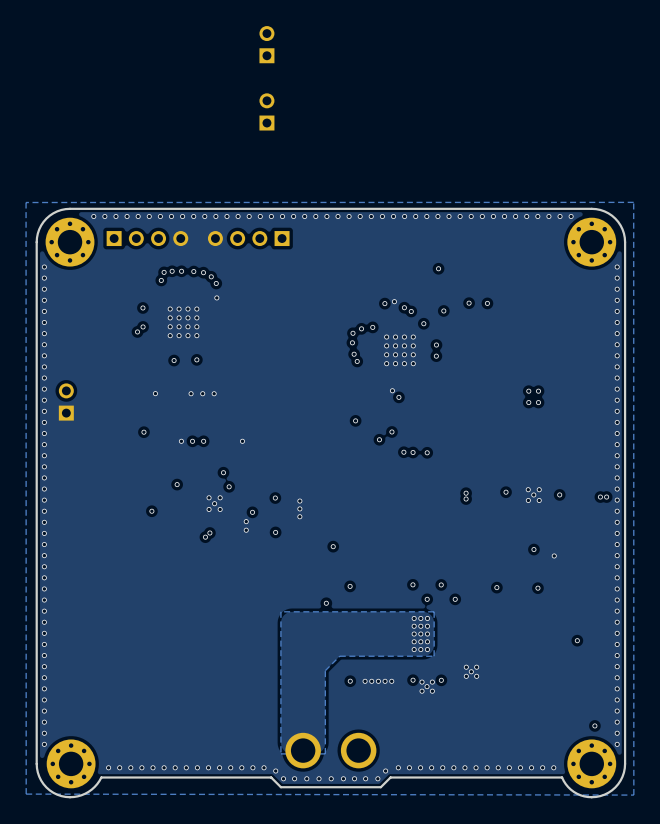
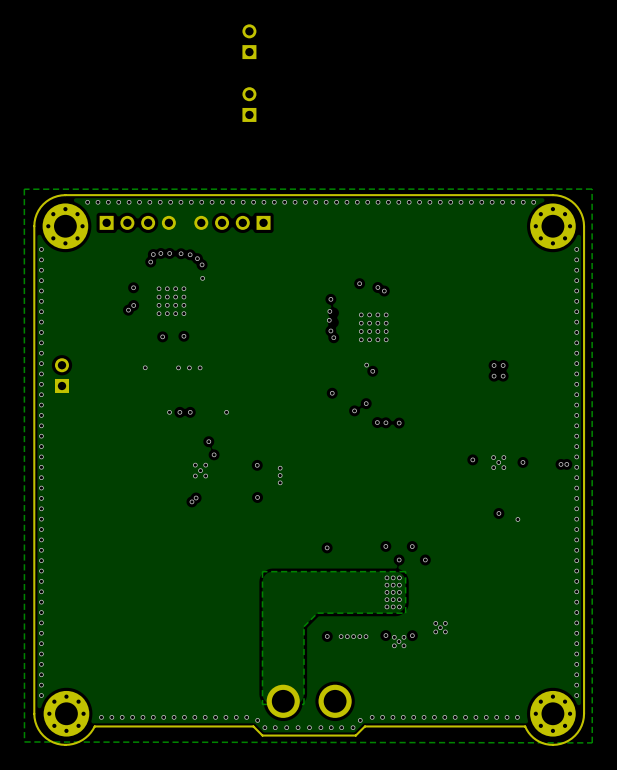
via: (438, 268) -> none
via: (394, 301) -> none
via: (469, 303) -> none
via: (487, 303) -> none
via: (443, 310) -> none
via: none -> (330, 299)
via: (423, 323) -> none
via: (372, 327) -> none
via: (361, 328) -> none
via: (436, 345) -> none
via: (436, 356) -> none
via: (143, 432) -> none
via: (177, 484) -> none
via: (466, 493) -> none
via: (466, 499) -> none
via: (151, 511) -> none
via: (252, 512) -> none
via: (246, 521) -> none
via: (246, 530) -> none
via: (333, 546) -> none
via: (496, 587) -> none
via: (537, 588) -> none
via: (326, 603) -> none
via: (577, 640) -> none
via: (594, 725) -> none

